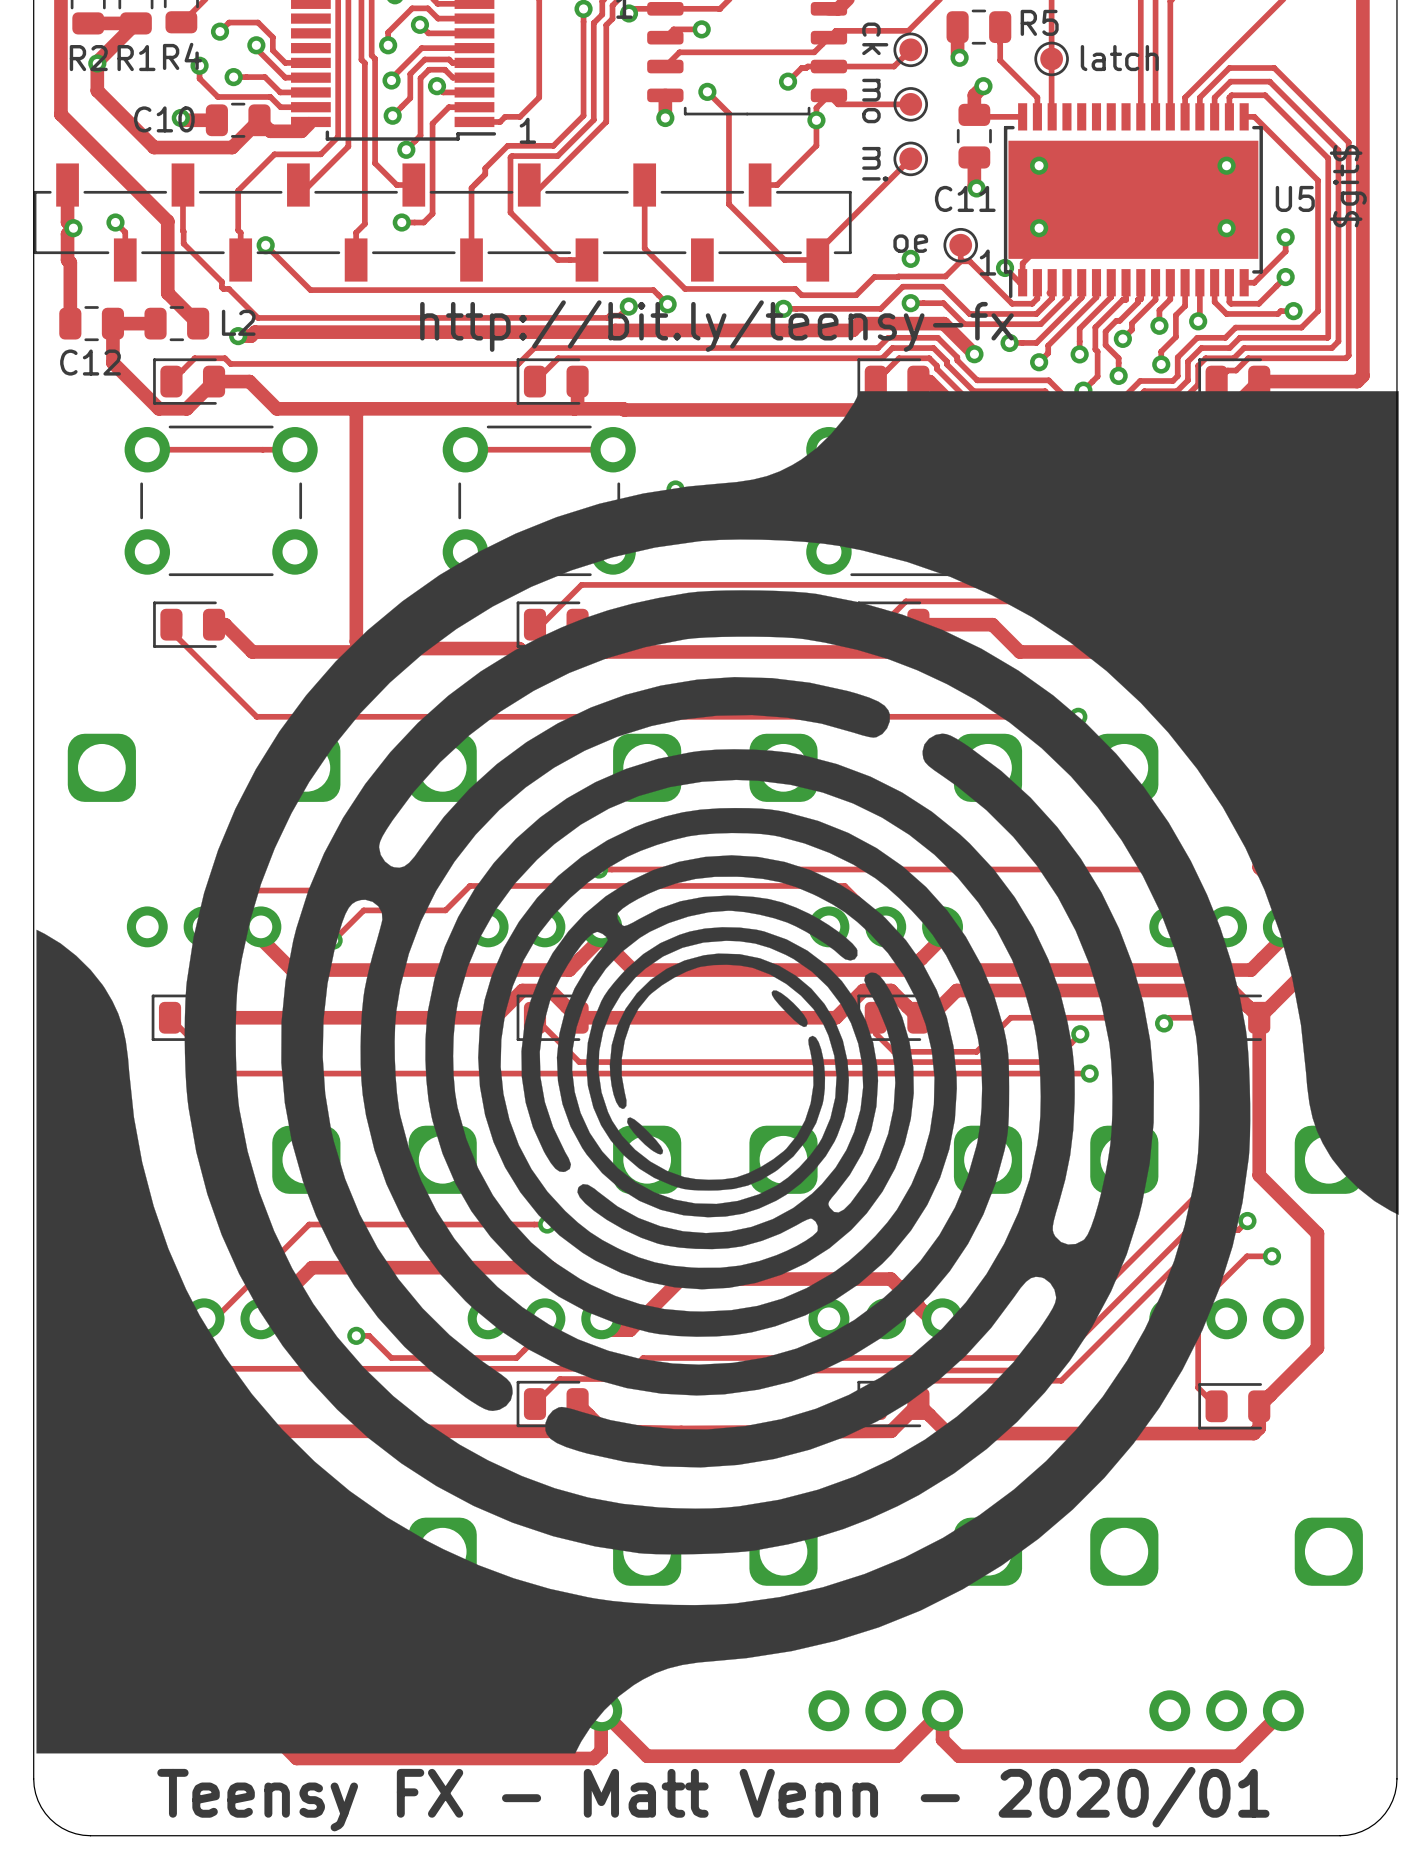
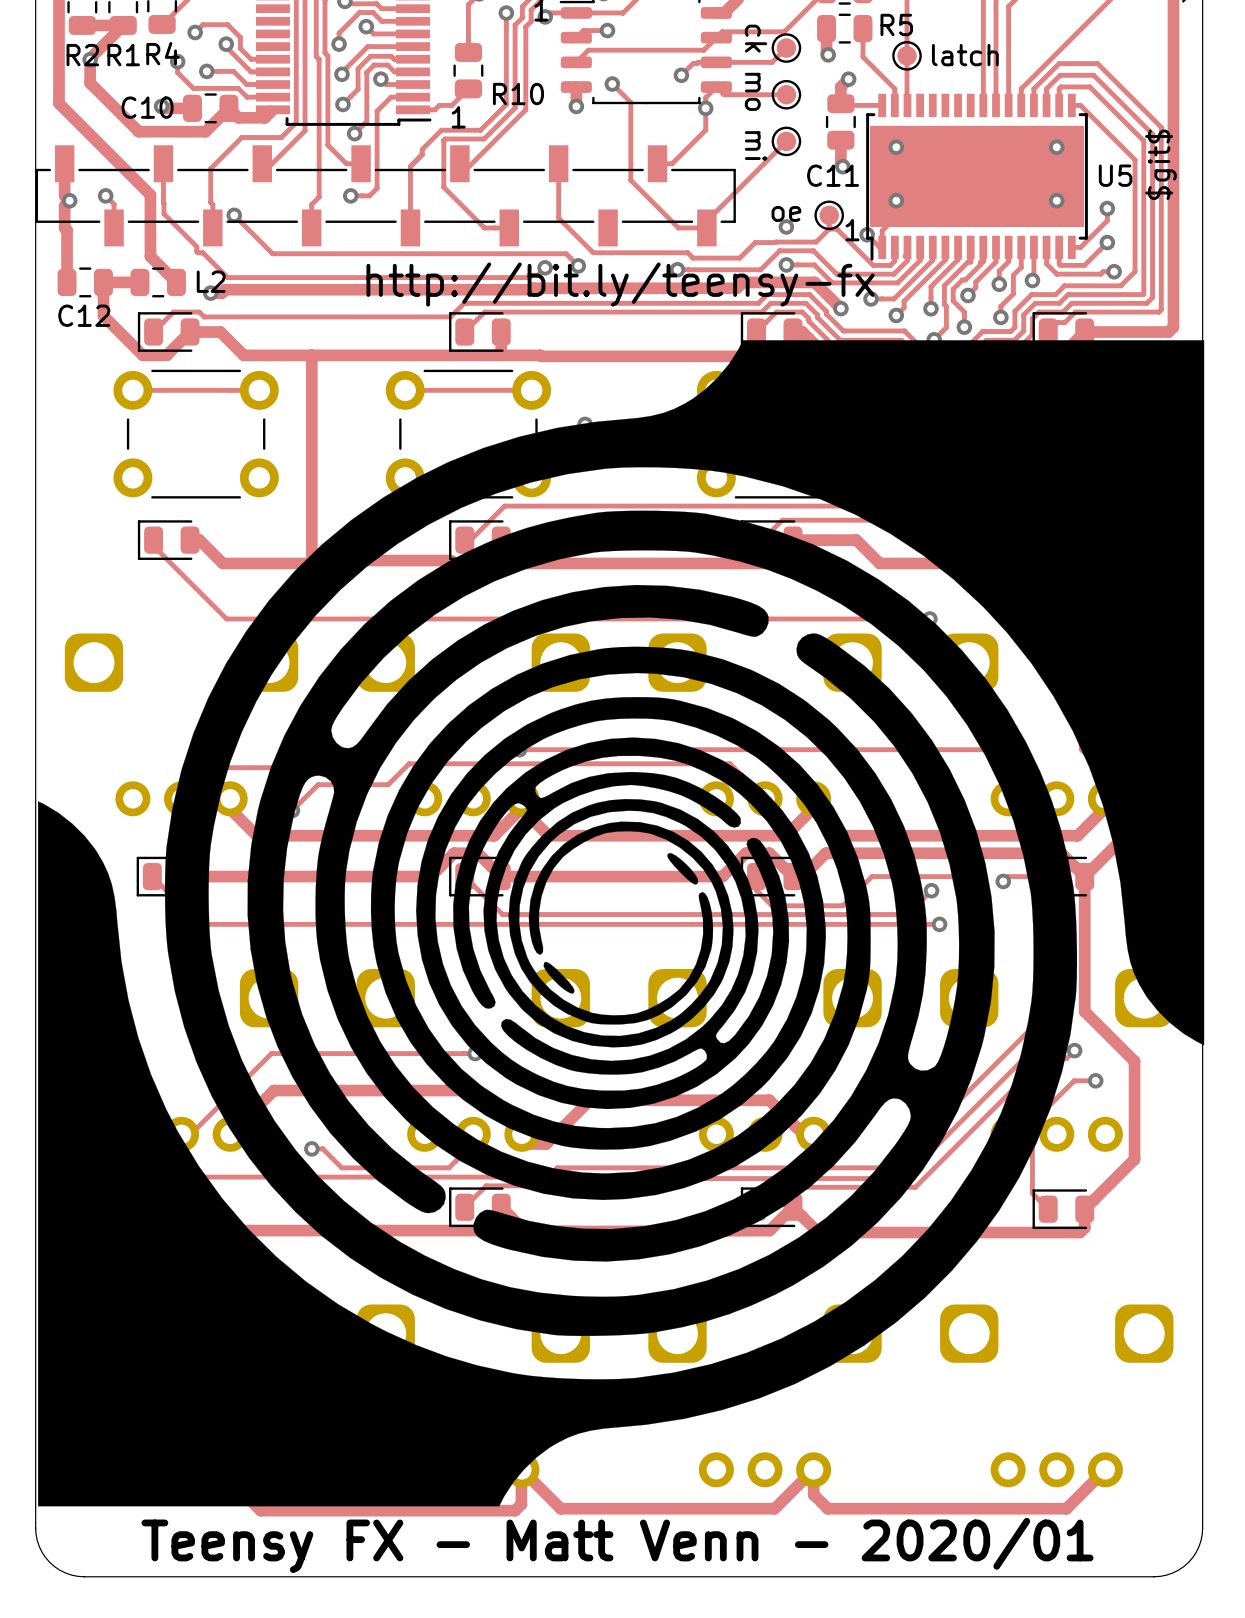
track: (539, 54) (539, 97) -> none
R10: none -> (468, 70)

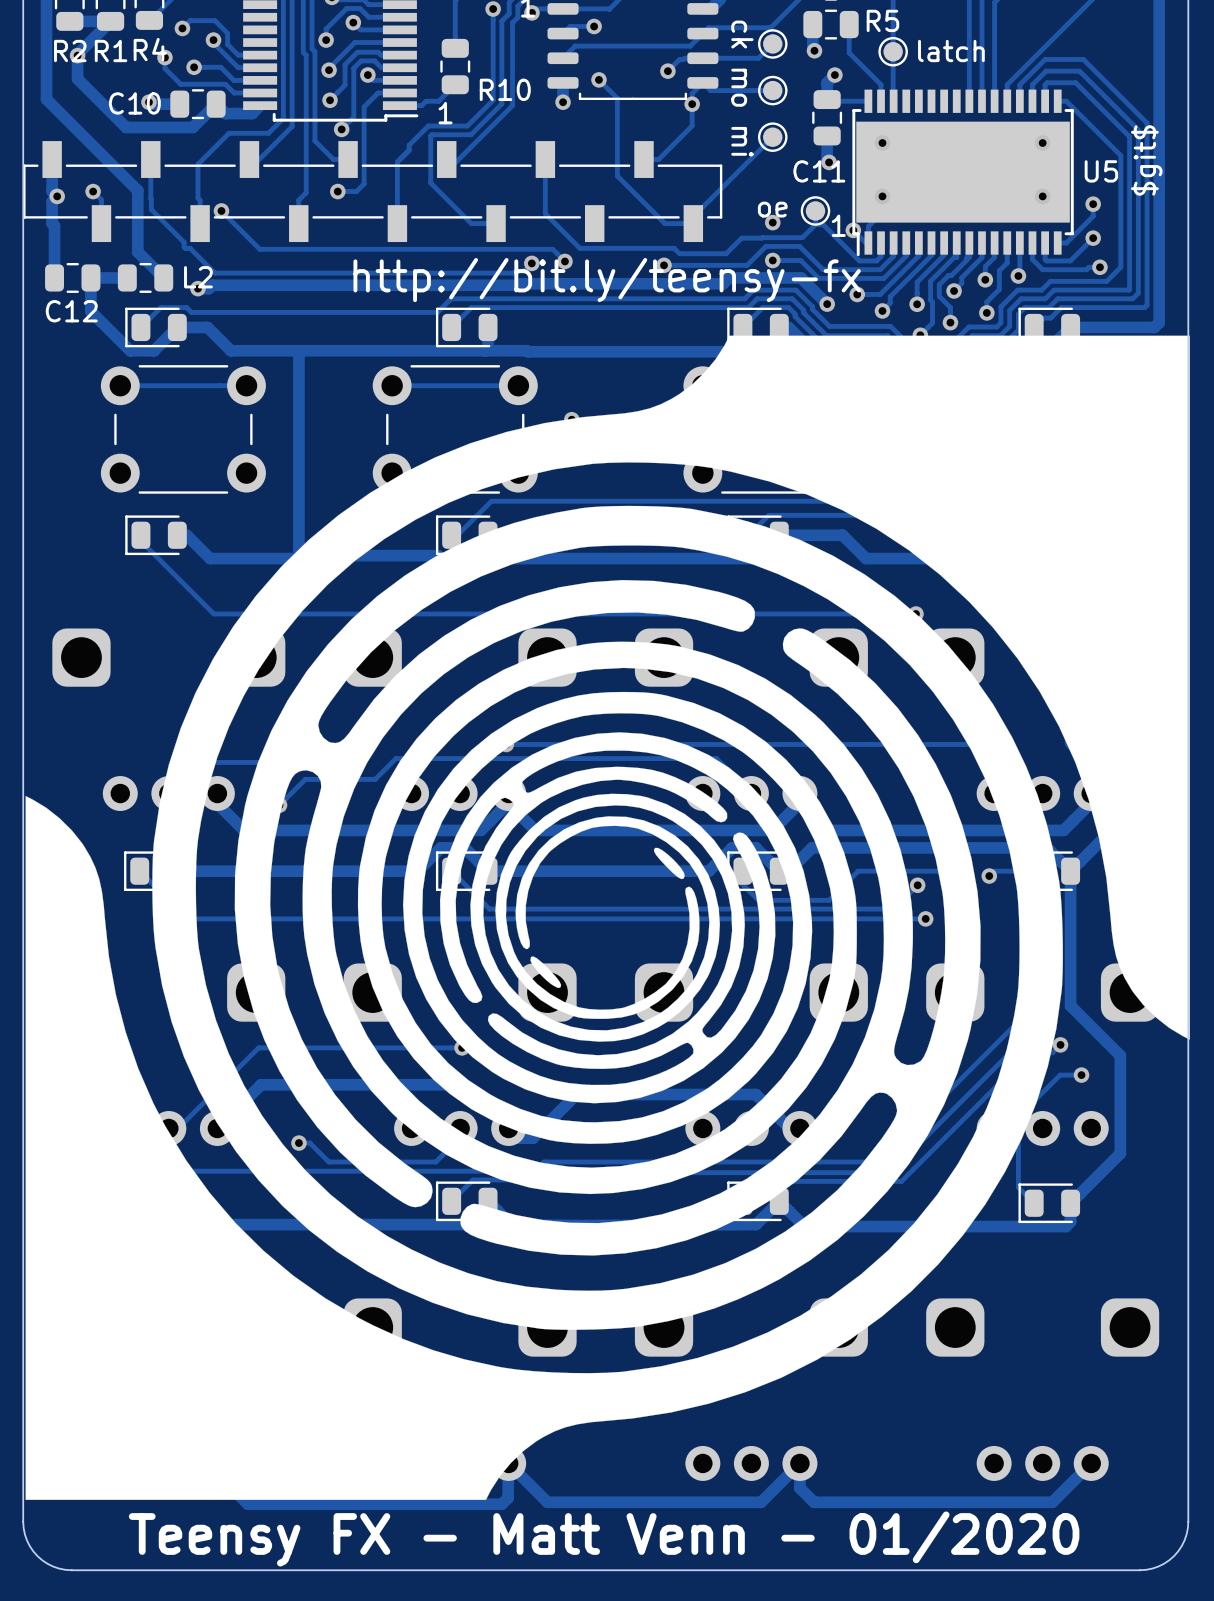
text: Teensy FX - Matt Venn - 2020/01 (617, 1545) -> Teensy FX - Matt Venn - 01/2020 (604, 1538)

